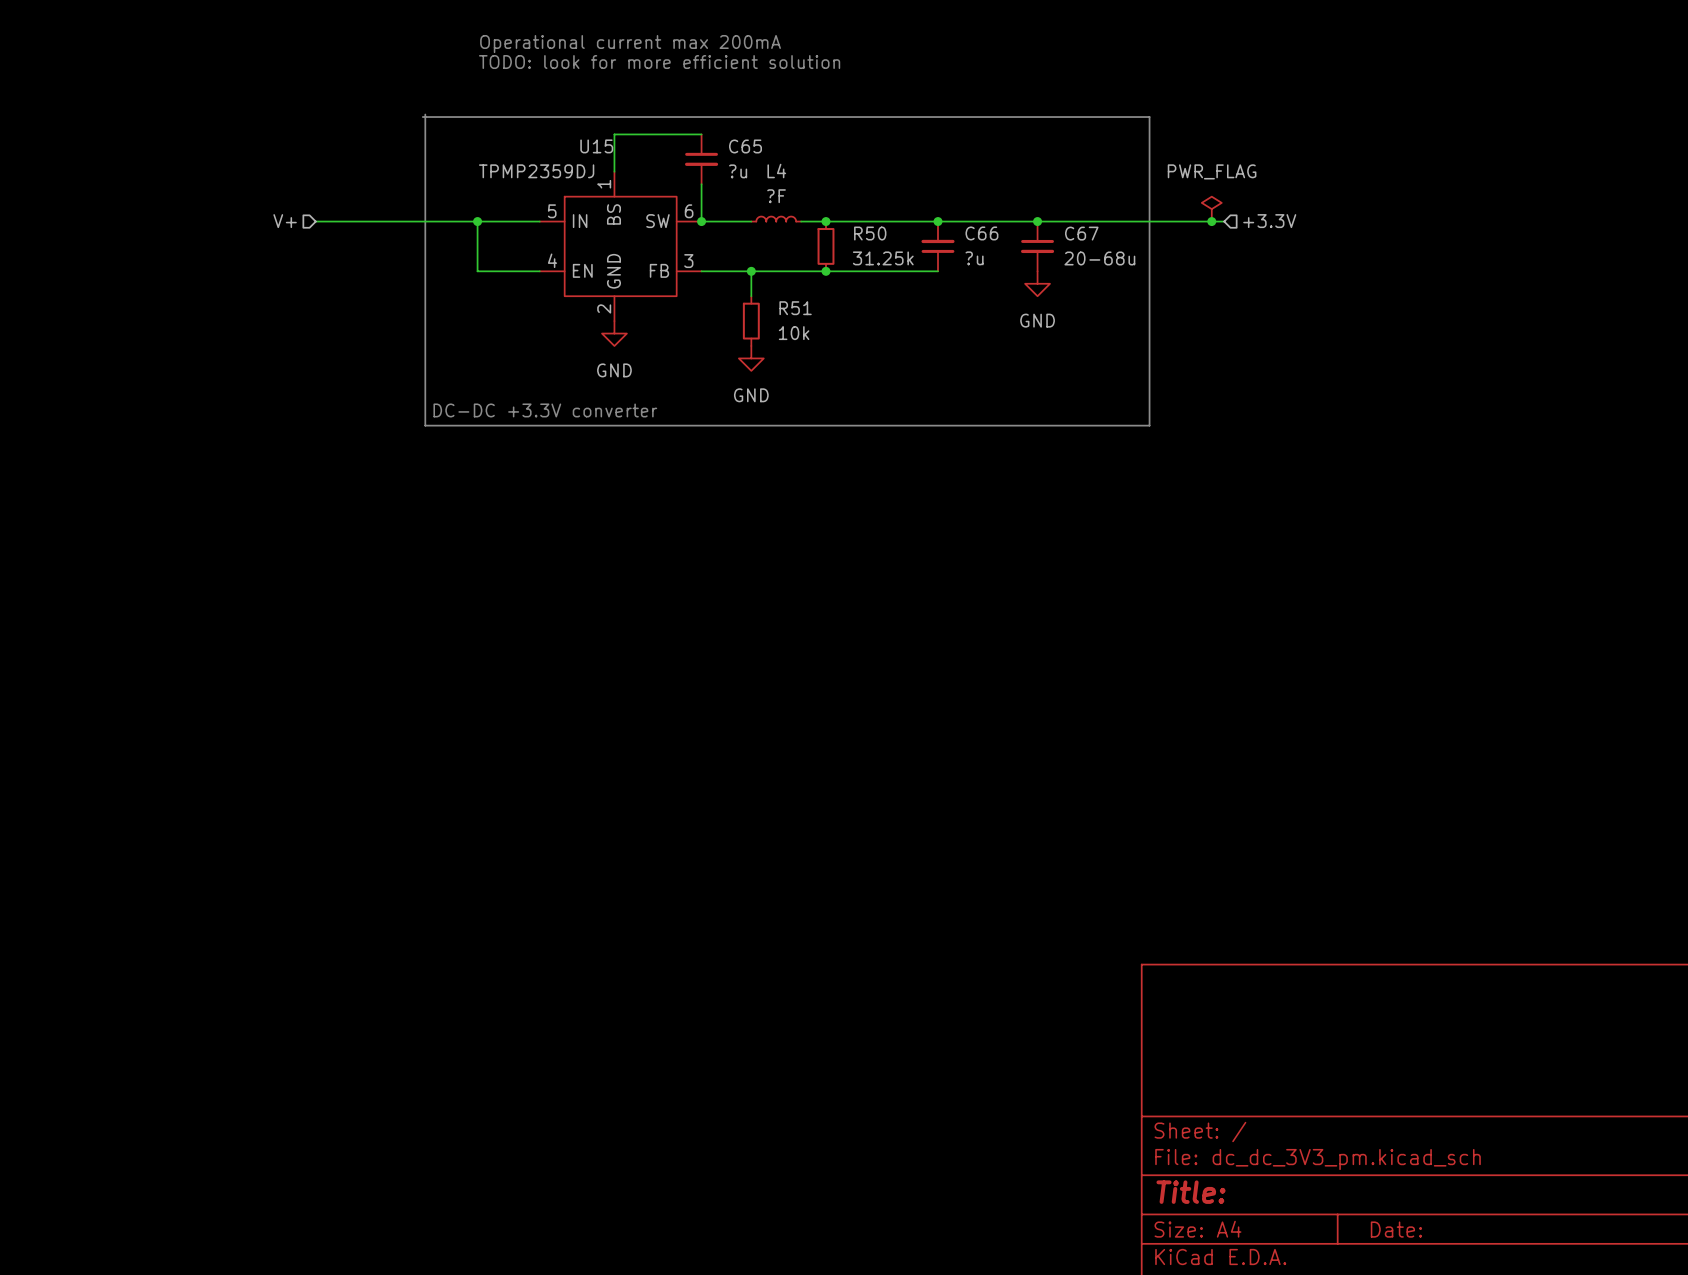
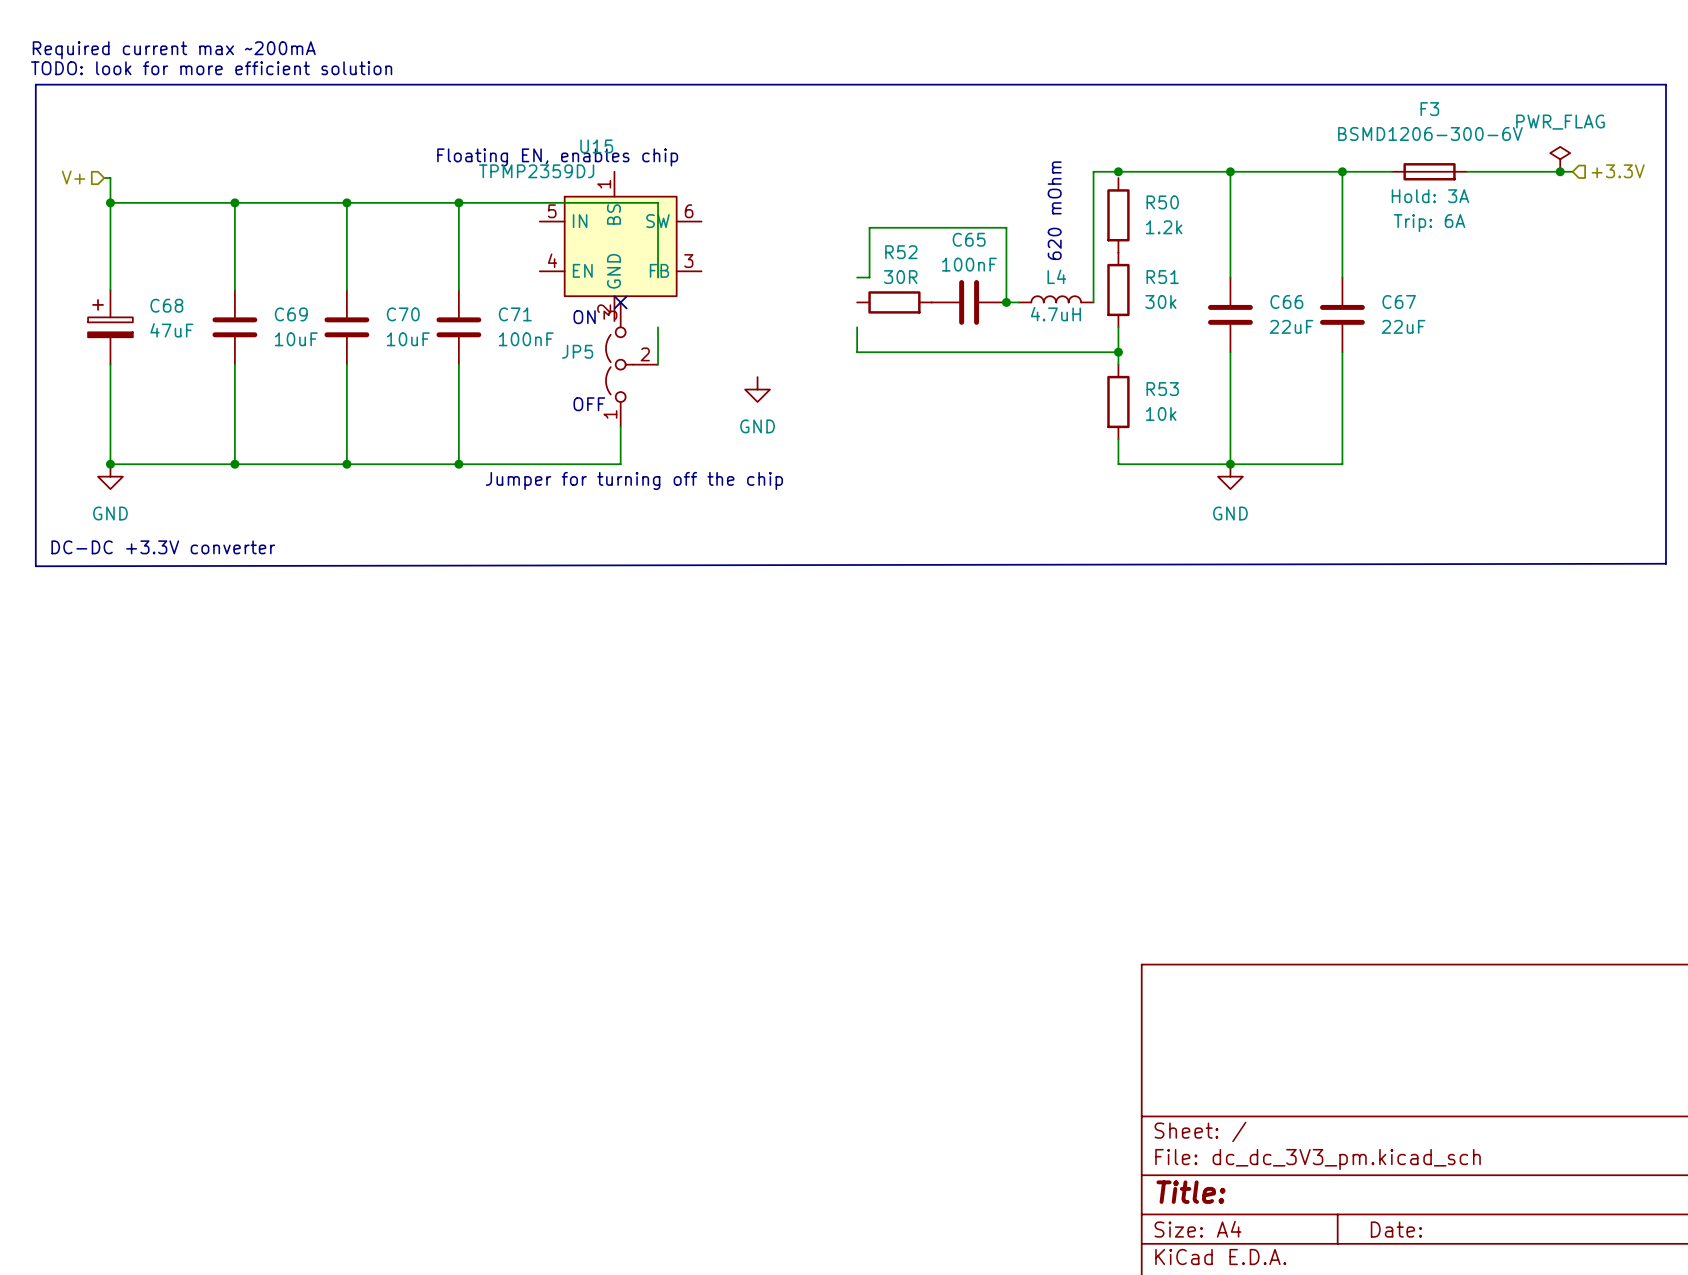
text: Operational current max 200mA (630, 44) -> none
text: none -> Required current max ~200mA (174, 50)
text: TODO: look for more efficient solution (659, 62) -> none
text: none -> TODO: look for more efficient solution (211, 68)
line: none -> (35, 84) (35, 566) (1665, 563) (1665, 84) (35, 84)
line: (425, 114) (425, 425) (1149, 425) (1149, 117) (422, 117) -> none
C65 symbol: [685, 134, 719, 185] -> [931, 280, 1007, 325]
wire: (701, 134) (614, 134) (614, 171) -> none
C65 name position: C65 (745, 146) -> C65 (969, 239)
text: none -> Floating EN, enables chip (557, 157)
power symbol: none -> PWR_FLAG (1560, 159)
C65 value: ?u (738, 171) -> 100nF (969, 264)
L4 name position: L4 (776, 171) -> L4 (1056, 276)
junction: none -> (1118, 171)
wire: none -> (1230, 171) (1230, 277)
junction: none -> (1230, 171)
wire: none -> (1342, 171) (1342, 277)
junction: none -> (1342, 171)
wire: none -> (1392, 171) (1093, 171) (1093, 302)
F3: none -> BSMD1206-300-6V (1429, 171)
wire: none -> (1466, 171) (1572, 171)
junction: none -> (1560, 171)
hierarchical label: none -> +3.3V (1618, 171)
wire: none -> (104, 177) (110, 177) (110, 289)
wire: (701, 184) (701, 221) (751, 221) -> none
L4 value: ?F (776, 196) -> 4.7uH (1055, 314)
wire: none -> (110, 202) (658, 202) (658, 277)
junction: none -> (110, 202)
wire: none -> (234, 202) (234, 289)
junction: none -> (234, 202)
wire: none -> (346, 202) (346, 289)
junction: none -> (346, 202)
wire: none -> (458, 202) (458, 289)
power symbol: PWR_FLAG (1211, 209) -> none
text: none -> 620 mOhm (1054, 210)
L4 symbol: [751, 216, 802, 222] -> [1018, 296, 1094, 303]
hierarchical label position: V+ (285, 221) -> V+ (73, 177)
wire: (315, 221) (539, 221) -> none
wire: (477, 221) (477, 271) (539, 271) -> none
junction position: (477, 221) -> (458, 202)
junction: (701, 221) -> none
wire: (801, 221) (1224, 221) -> none
R50 symbol: [817, 221, 835, 272] -> [1107, 177, 1130, 253]
junction: (826, 221) -> none
C66 symbol: [921, 221, 955, 272] -> [1208, 277, 1253, 353]
junction: (938, 221) -> none
C67 symbol: [1021, 221, 1055, 272] -> [1320, 277, 1365, 353]
junction: (1037, 221) -> none
junction: (1211, 221) -> none
hierarchical label: +3.3V (1269, 221) -> none
R50 value: 31.25k (883, 258) -> 1.2k (1164, 227)
C66 value: ?u (974, 258) -> 22uF (1291, 326)
C67 value: 20-68u (1099, 258) -> 22uF (1403, 326)
wire: (701, 271) (938, 271) -> none
wire: (751, 271) (751, 296) -> none
junction: (751, 271) -> none
junction: (826, 271) -> none
wire: none -> (857, 277) (869, 277) (869, 227) (1006, 227) (1006, 302) (1018, 302)
power symbol: GND (1037, 283) -> none
R51 symbol: [742, 296, 760, 346] -> [1107, 252, 1130, 328]
no-connect mark: none -> (620, 302)
R52: none -> 30R (894, 302)
junction: none -> (1006, 302)
text: none -> ON (584, 317)
C68: none -> 47uF (110, 327)
C69: none -> 10uF (234, 327)
C70: none -> 10uF (346, 327)
C71: none -> 100nF (458, 327)
wire: none -> (658, 327) (658, 364)
wire: none -> (857, 327) (857, 352) (1118, 352)
wire: none -> (1118, 327) (1118, 364)
power symbol: GND (614, 333) -> none
R51 value: 10k (794, 333) -> 30k (1160, 301)
junction: none -> (1118, 352)
wire: none -> (1230, 352) (1230, 464)
wire: none -> (1342, 352) (1342, 464) (1118, 464) (1118, 439)
power symbol position: GND (751, 358) -> GND (757, 389)
wire: none -> (110, 364) (110, 464) (620, 464) (620, 426)
wire: none -> (234, 364) (234, 464)
wire: none -> (346, 364) (346, 464)
wire: none -> (458, 364) (458, 464)
JP5: none -> (631, 364)
R53: none -> 10k (1118, 401)
text: none -> OFF (589, 404)
text: DC-DC +3.3V converter (545, 410) -> none
junction: none -> (110, 464)
junction: none -> (234, 464)
junction: none -> (346, 464)
junction: none -> (458, 464)
junction: none -> (1230, 464)
power symbol: none -> GND (110, 476)
power symbol: none -> GND (1230, 476)
text: none -> Jumper for turning off the chip (634, 480)
text: none -> DC-DC +3.3V converter (163, 547)

